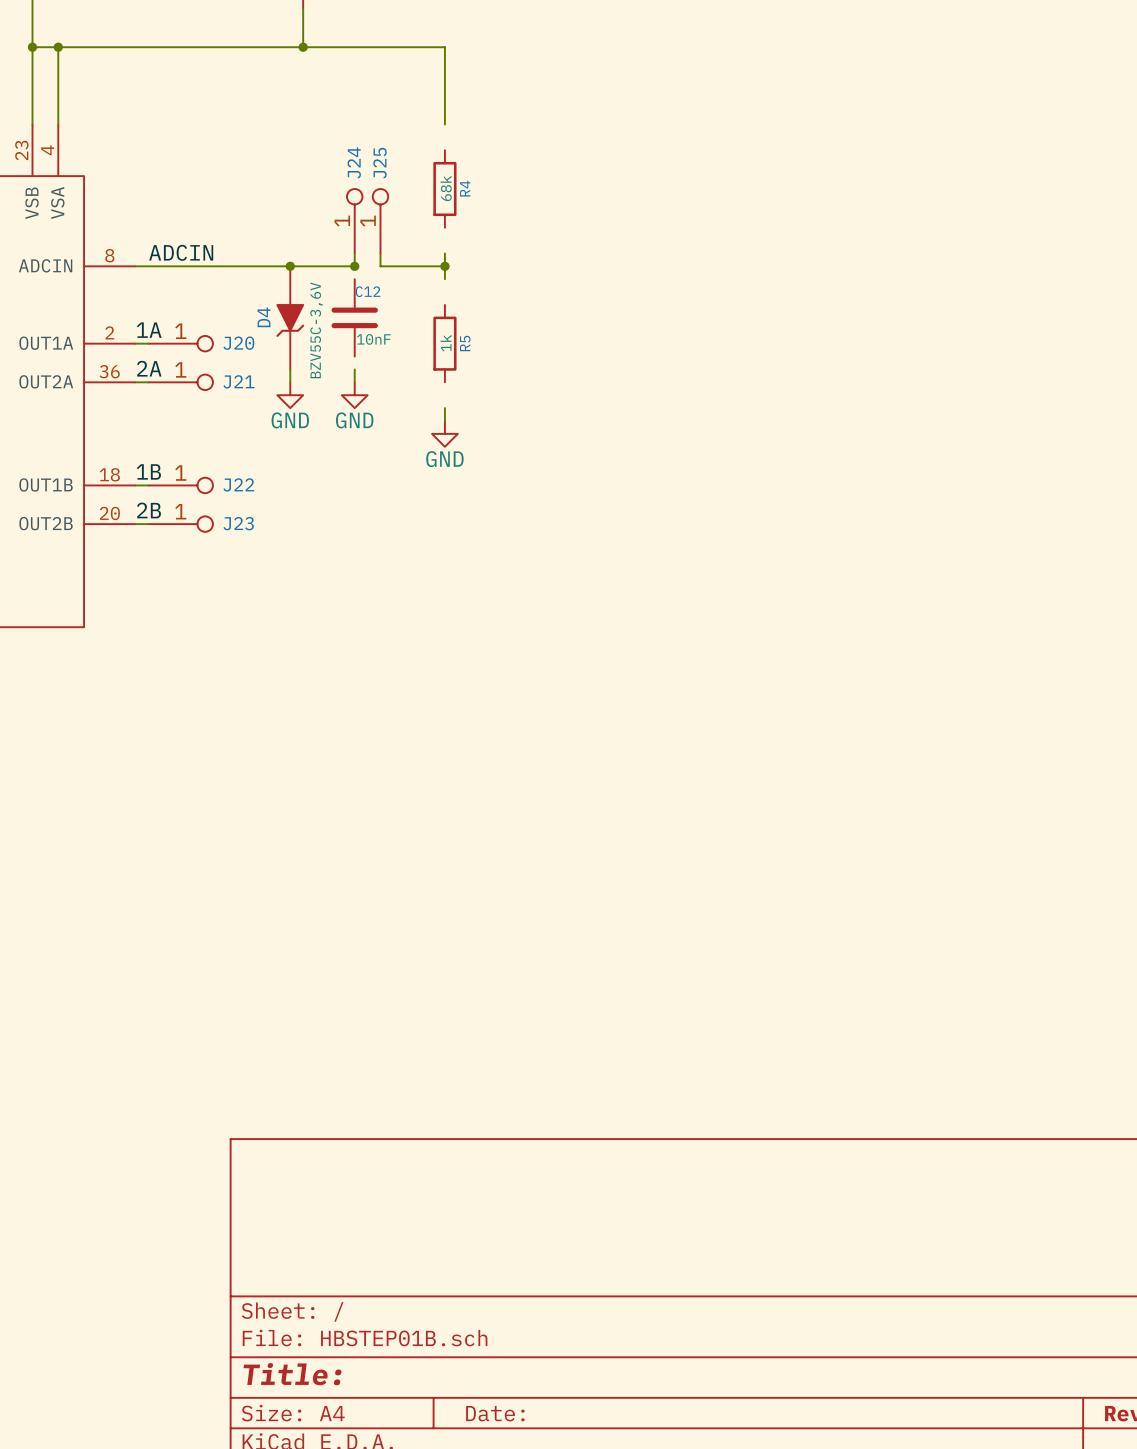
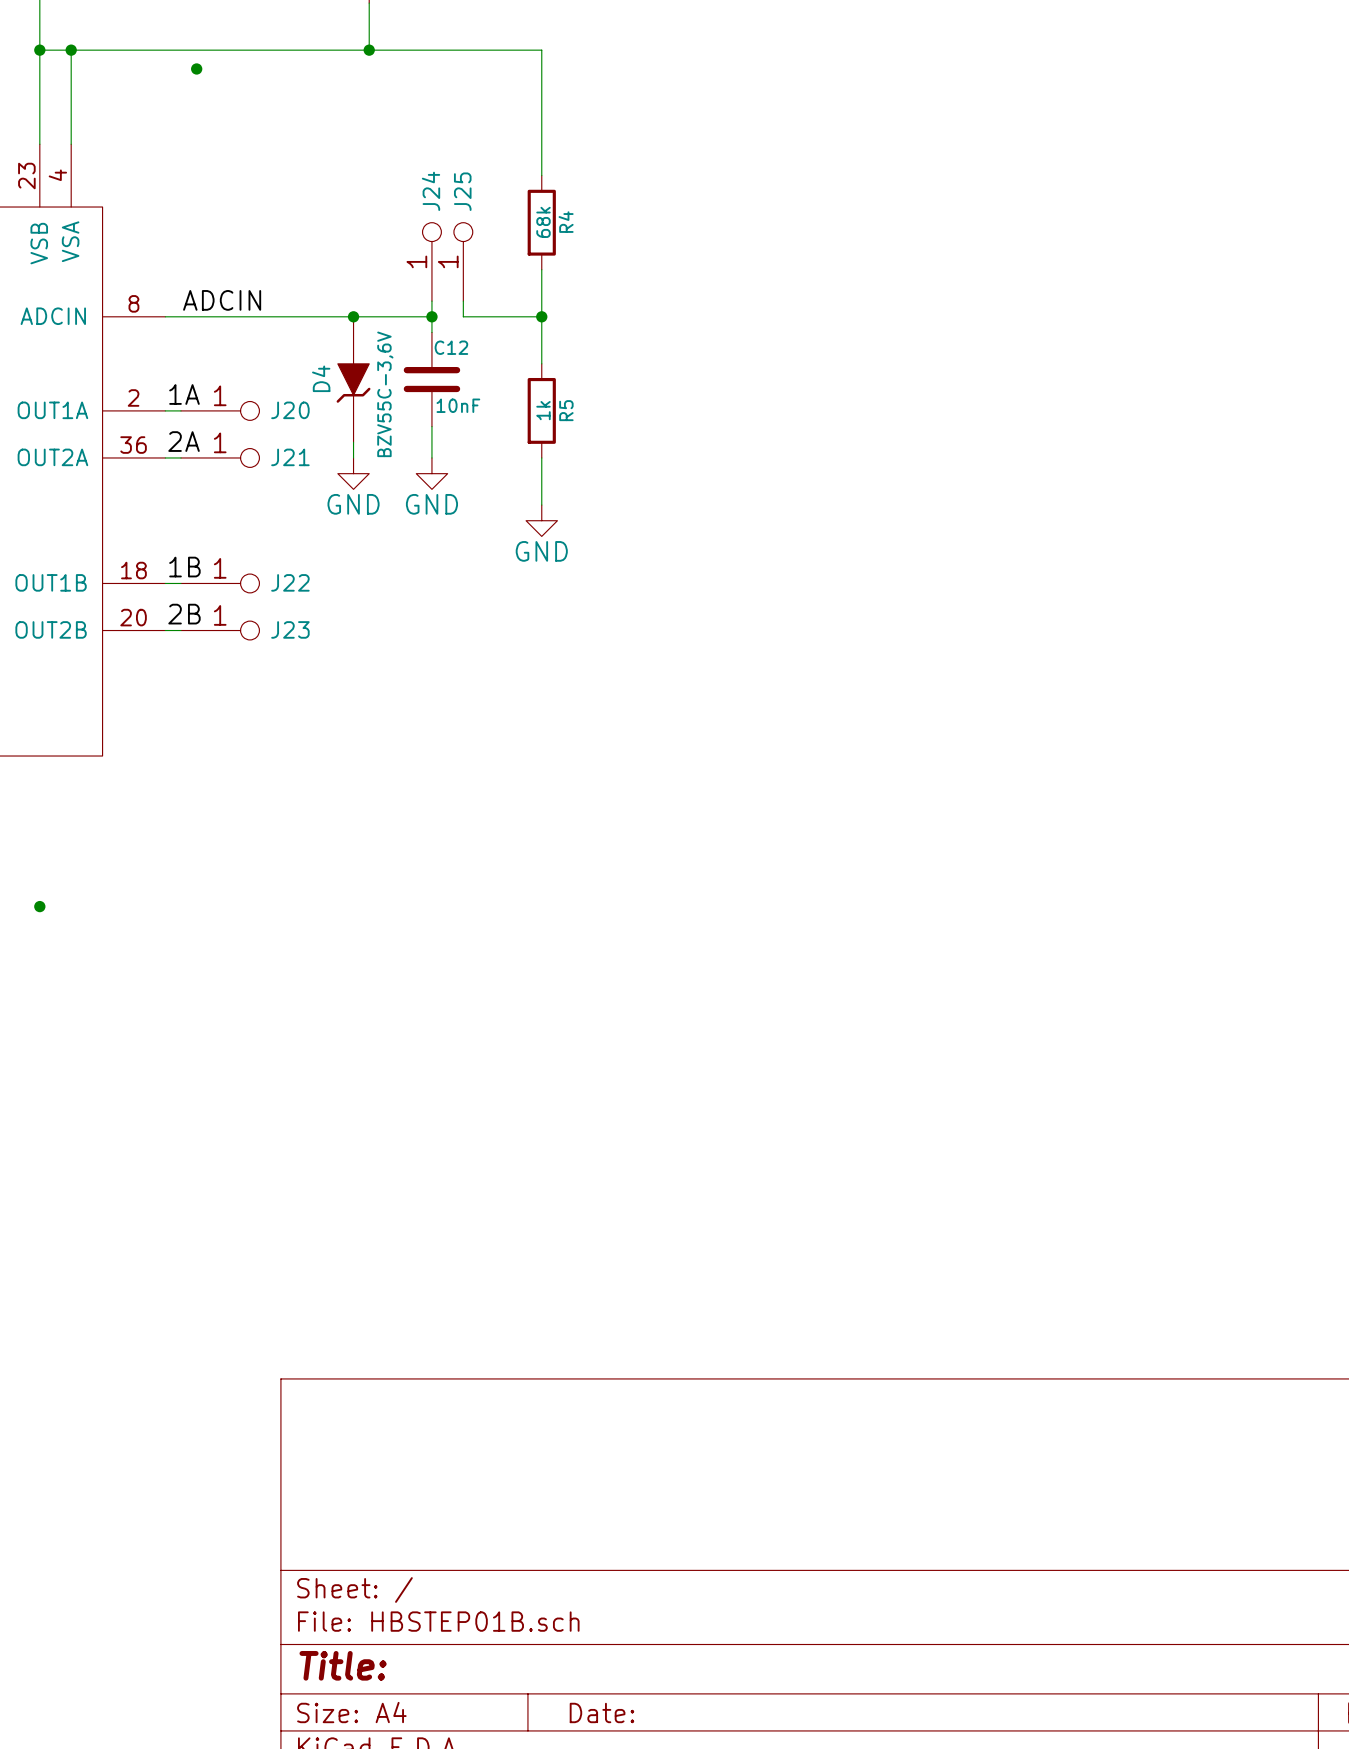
junction: none -> (196, 68)
wire: none -> (541, 144) (541, 175)
wire: none -> (541, 269) (541, 301)
wire: none -> (431, 316) (431, 332)
wire: none -> (541, 332) (541, 363)
wire: none -> (431, 426) (431, 442)
wire: none -> (541, 457) (541, 489)
junction: none -> (39, 906)

